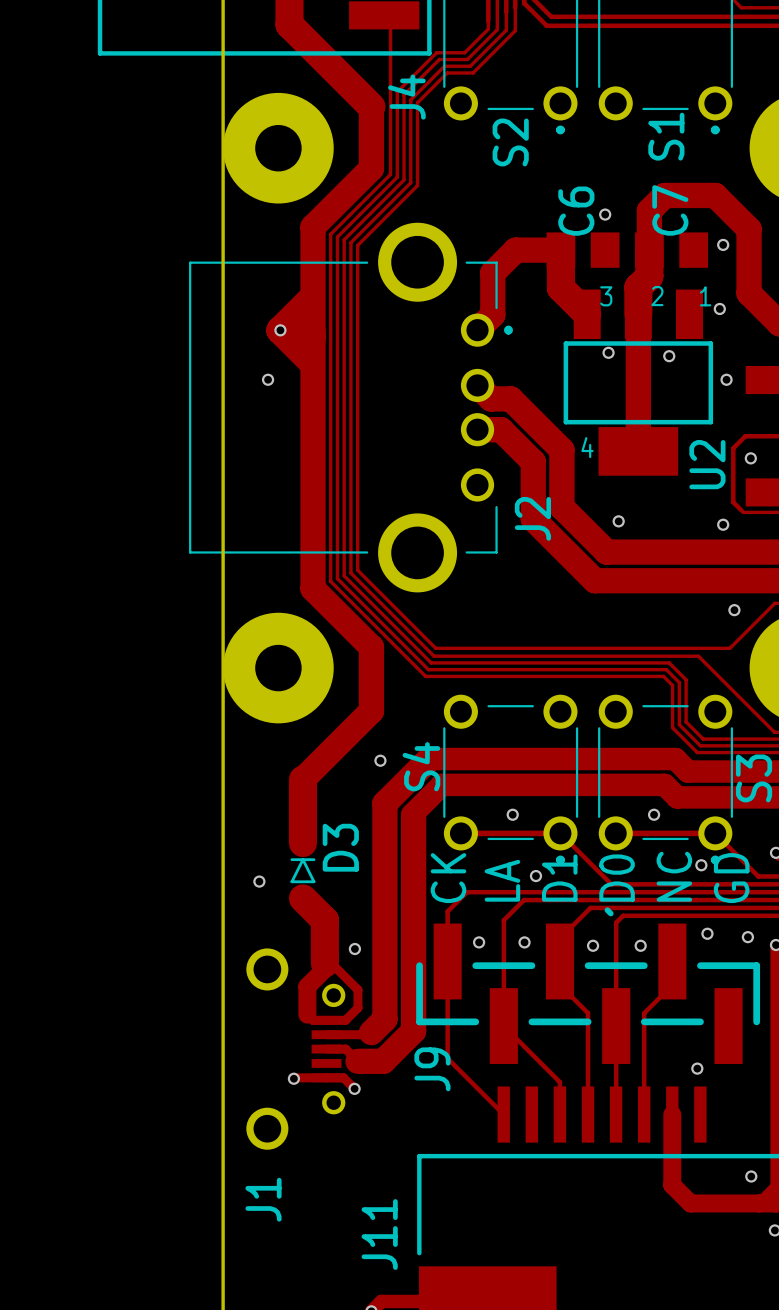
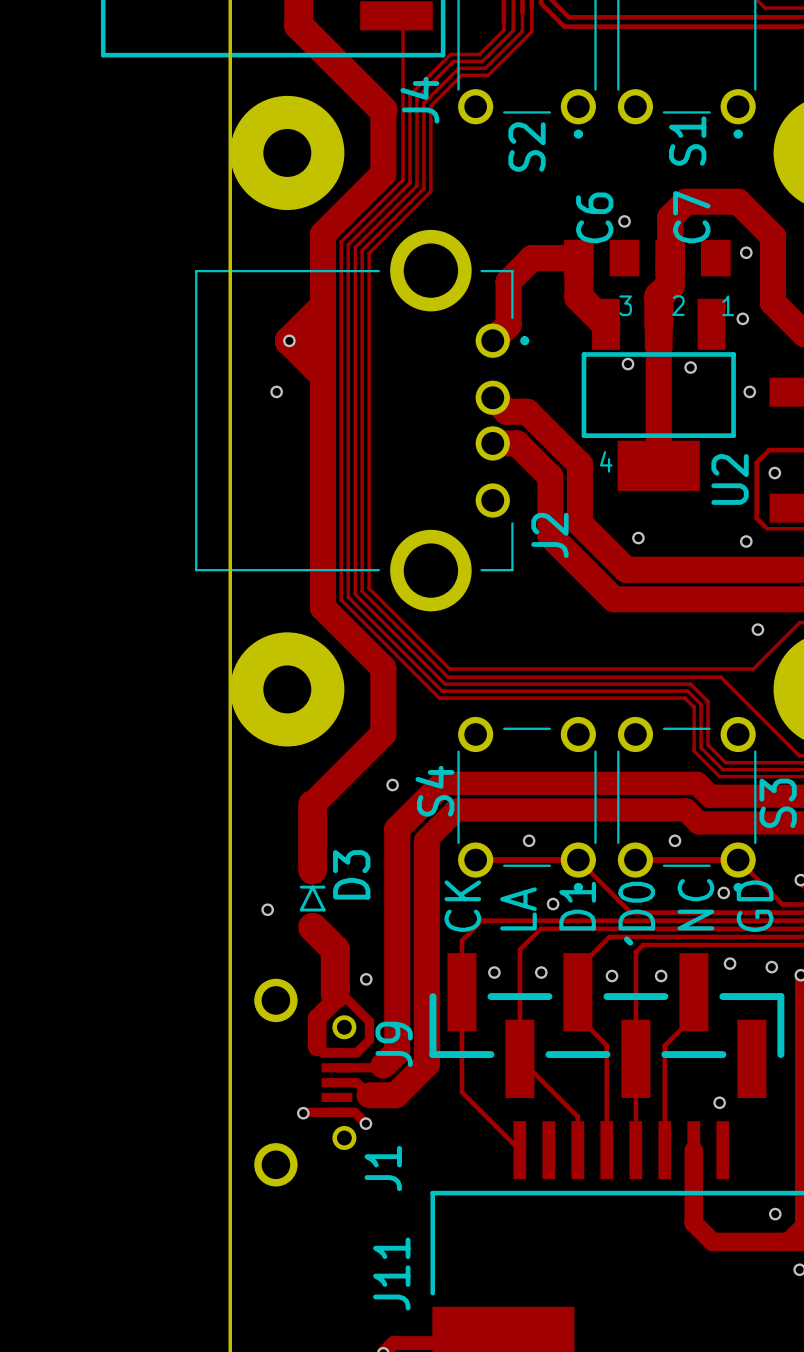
J9 name position: J9 (432, 1069) -> J9 (394, 1044)
J1 name position: J1 (263, 1199) -> J1 (383, 1168)

